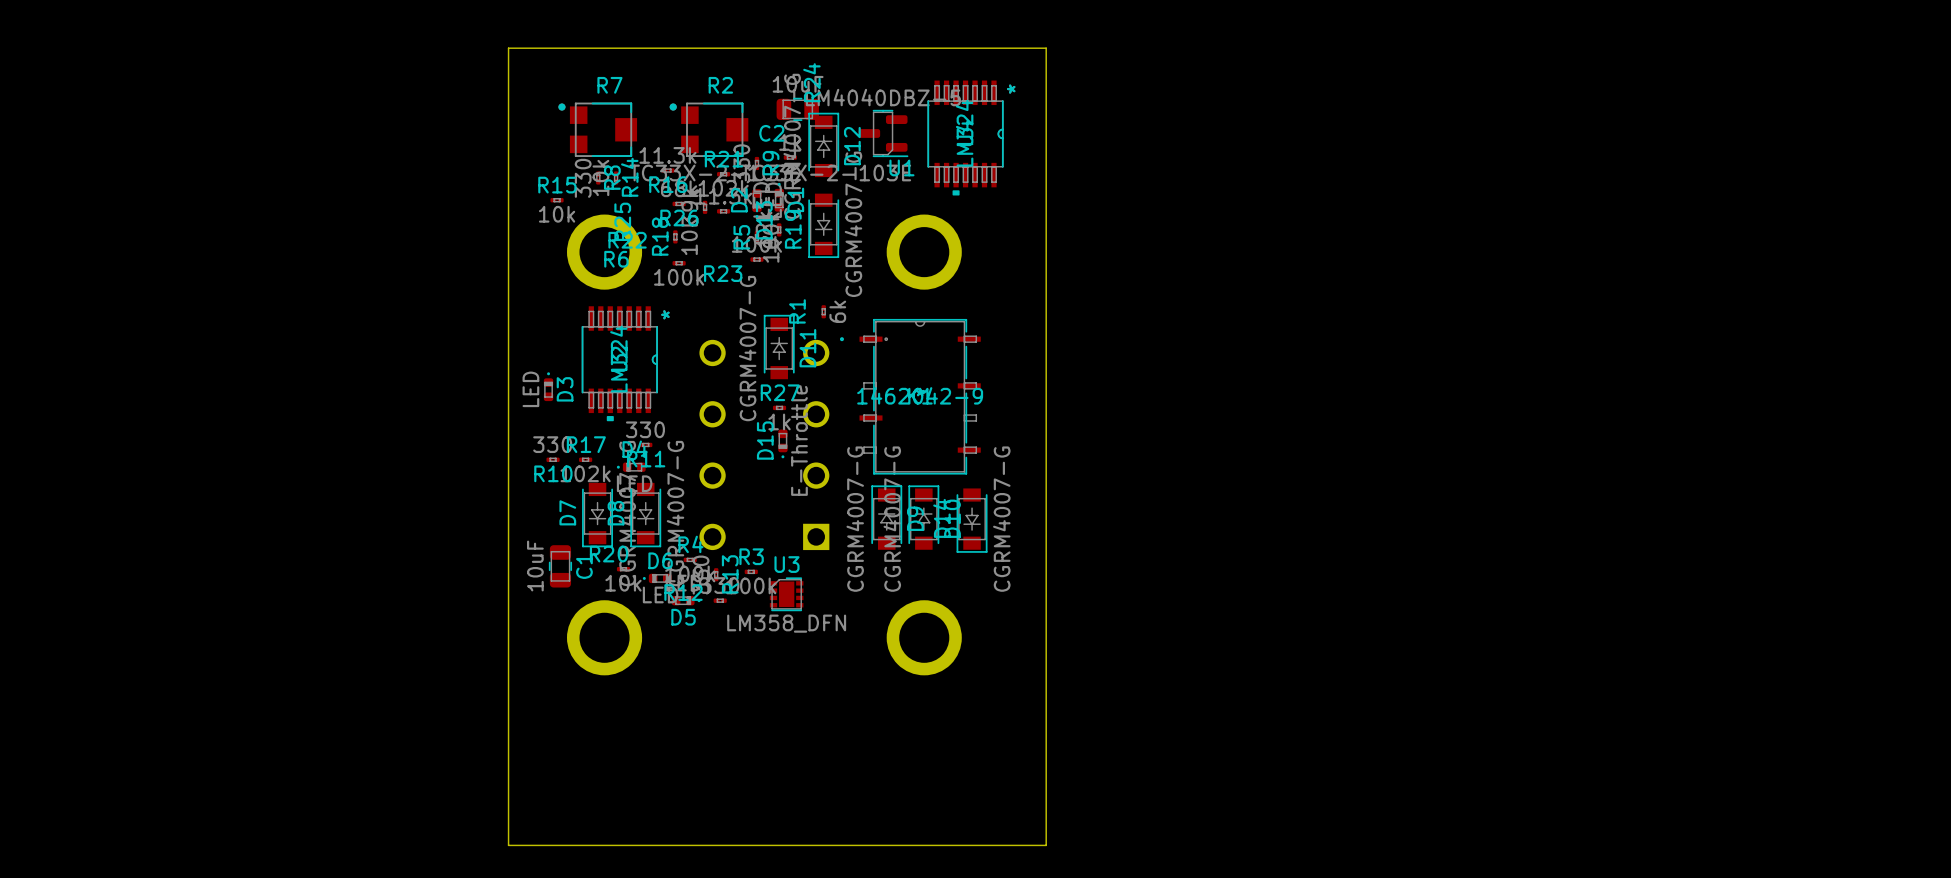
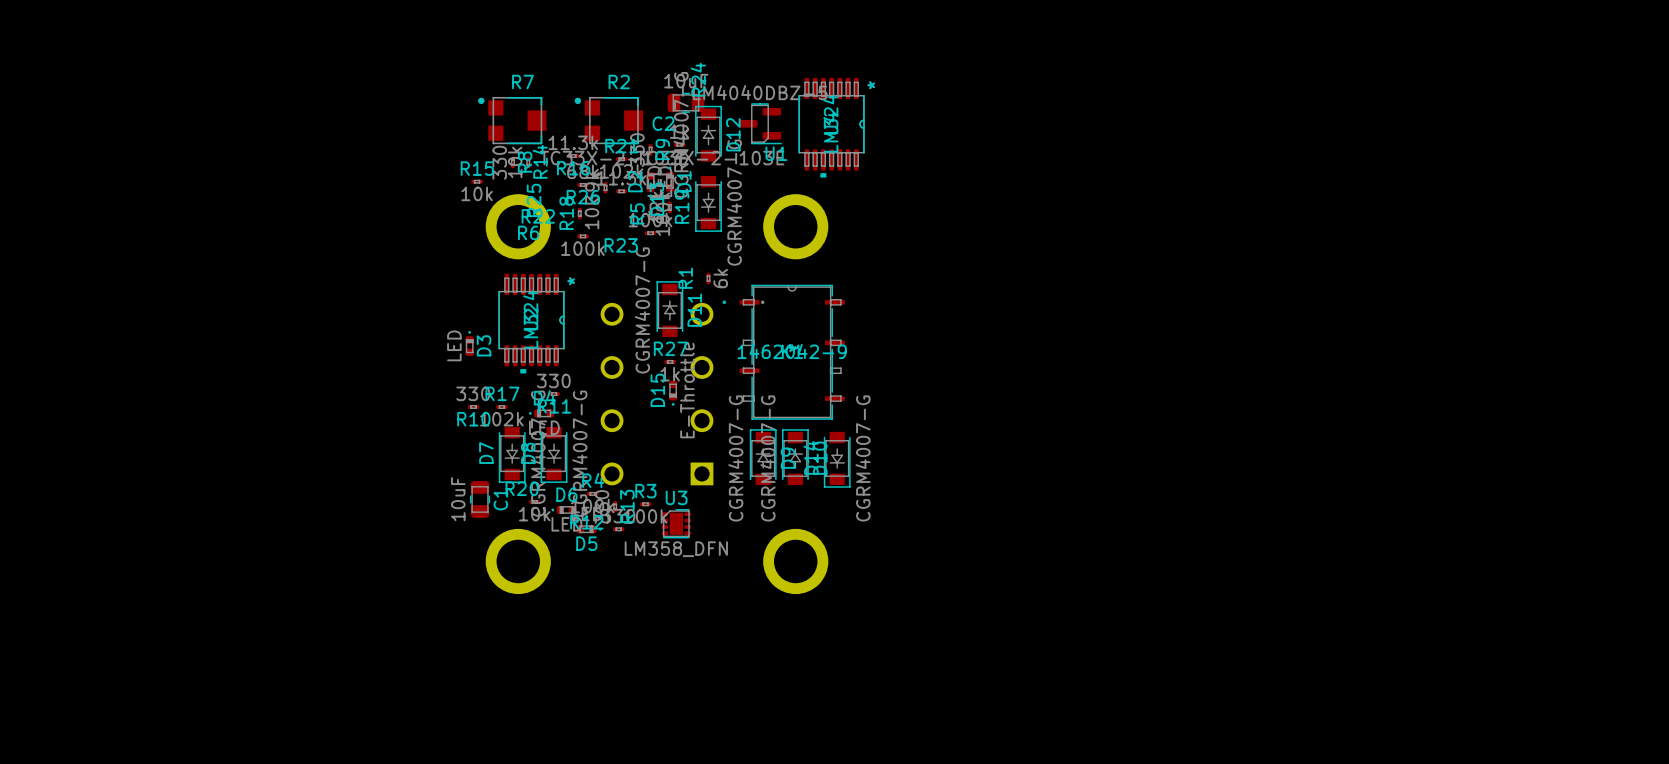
board edge: (508, 48) (1046, 48) (1046, 845) (508, 845) (508, 48) -> none

